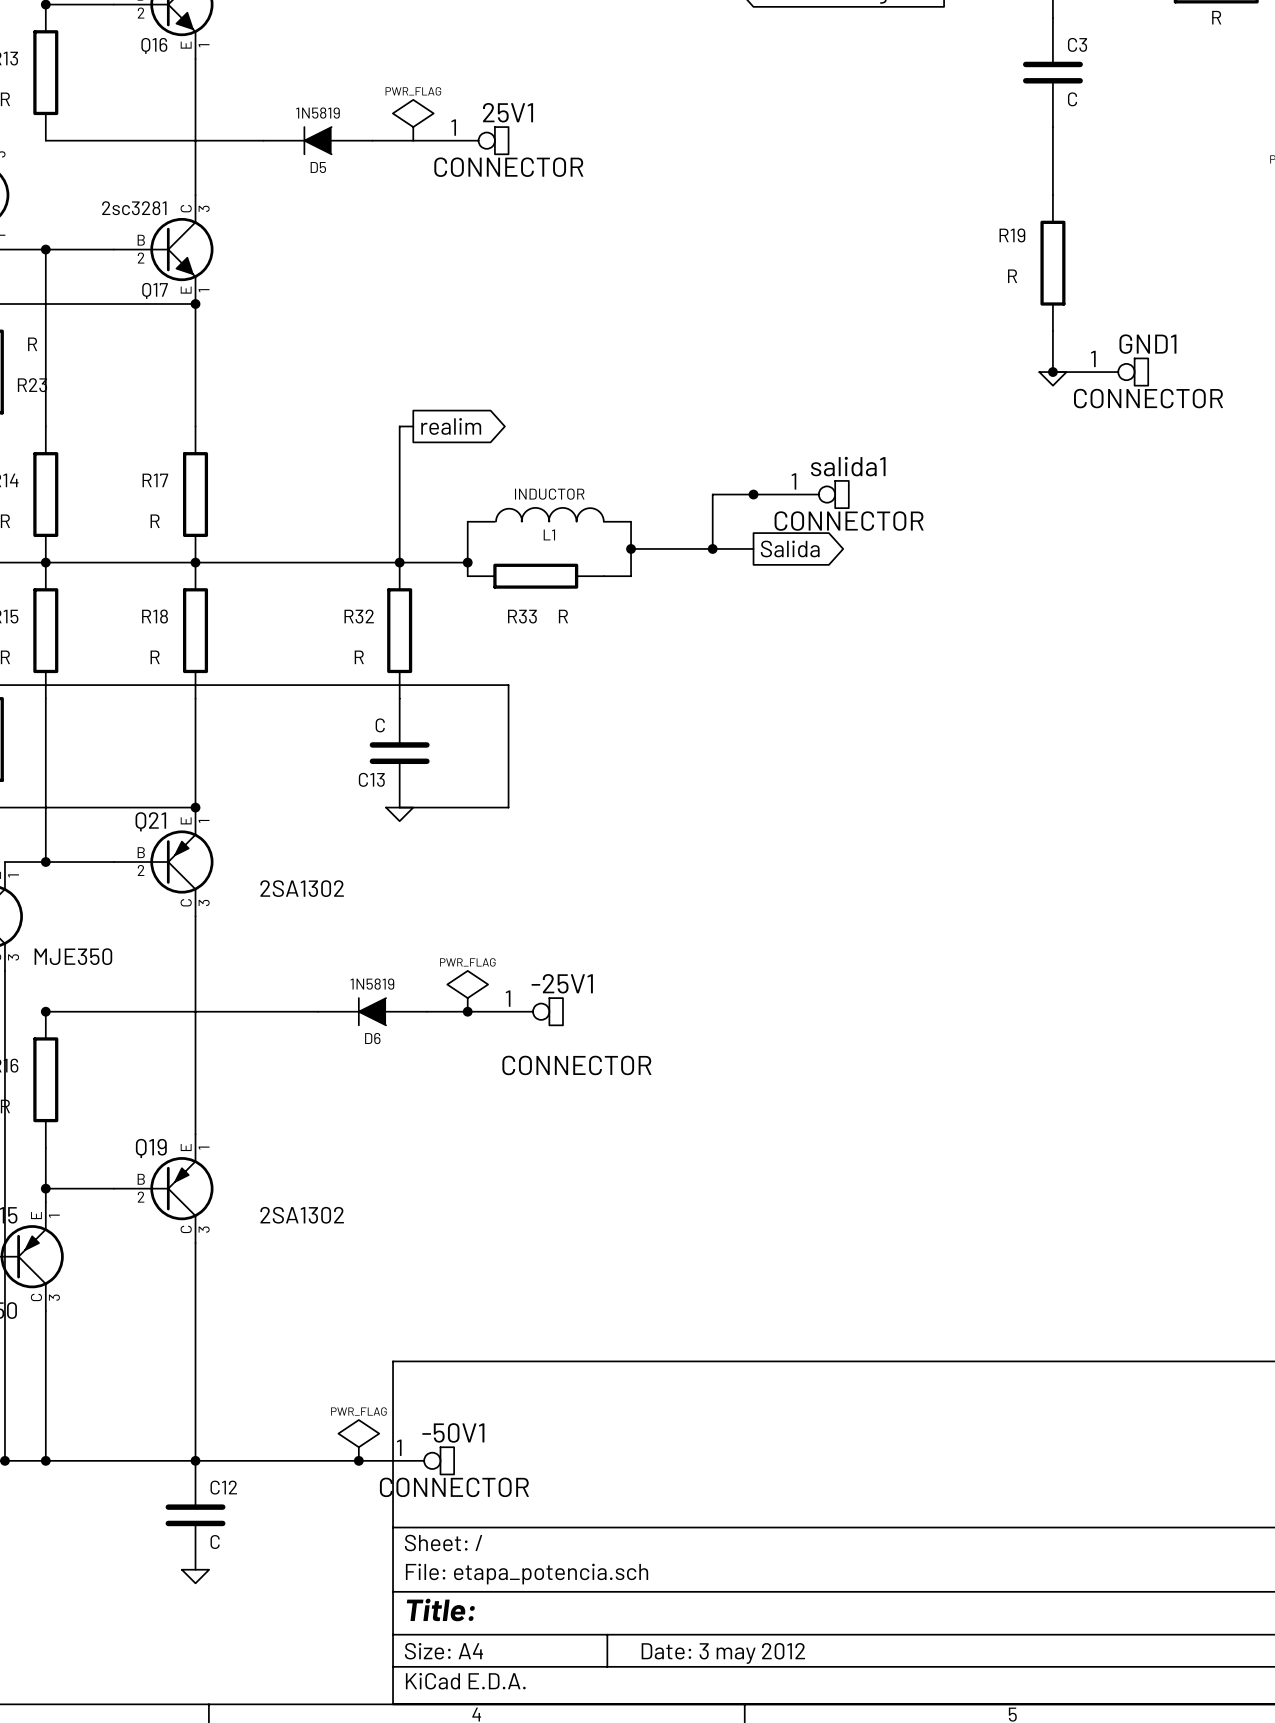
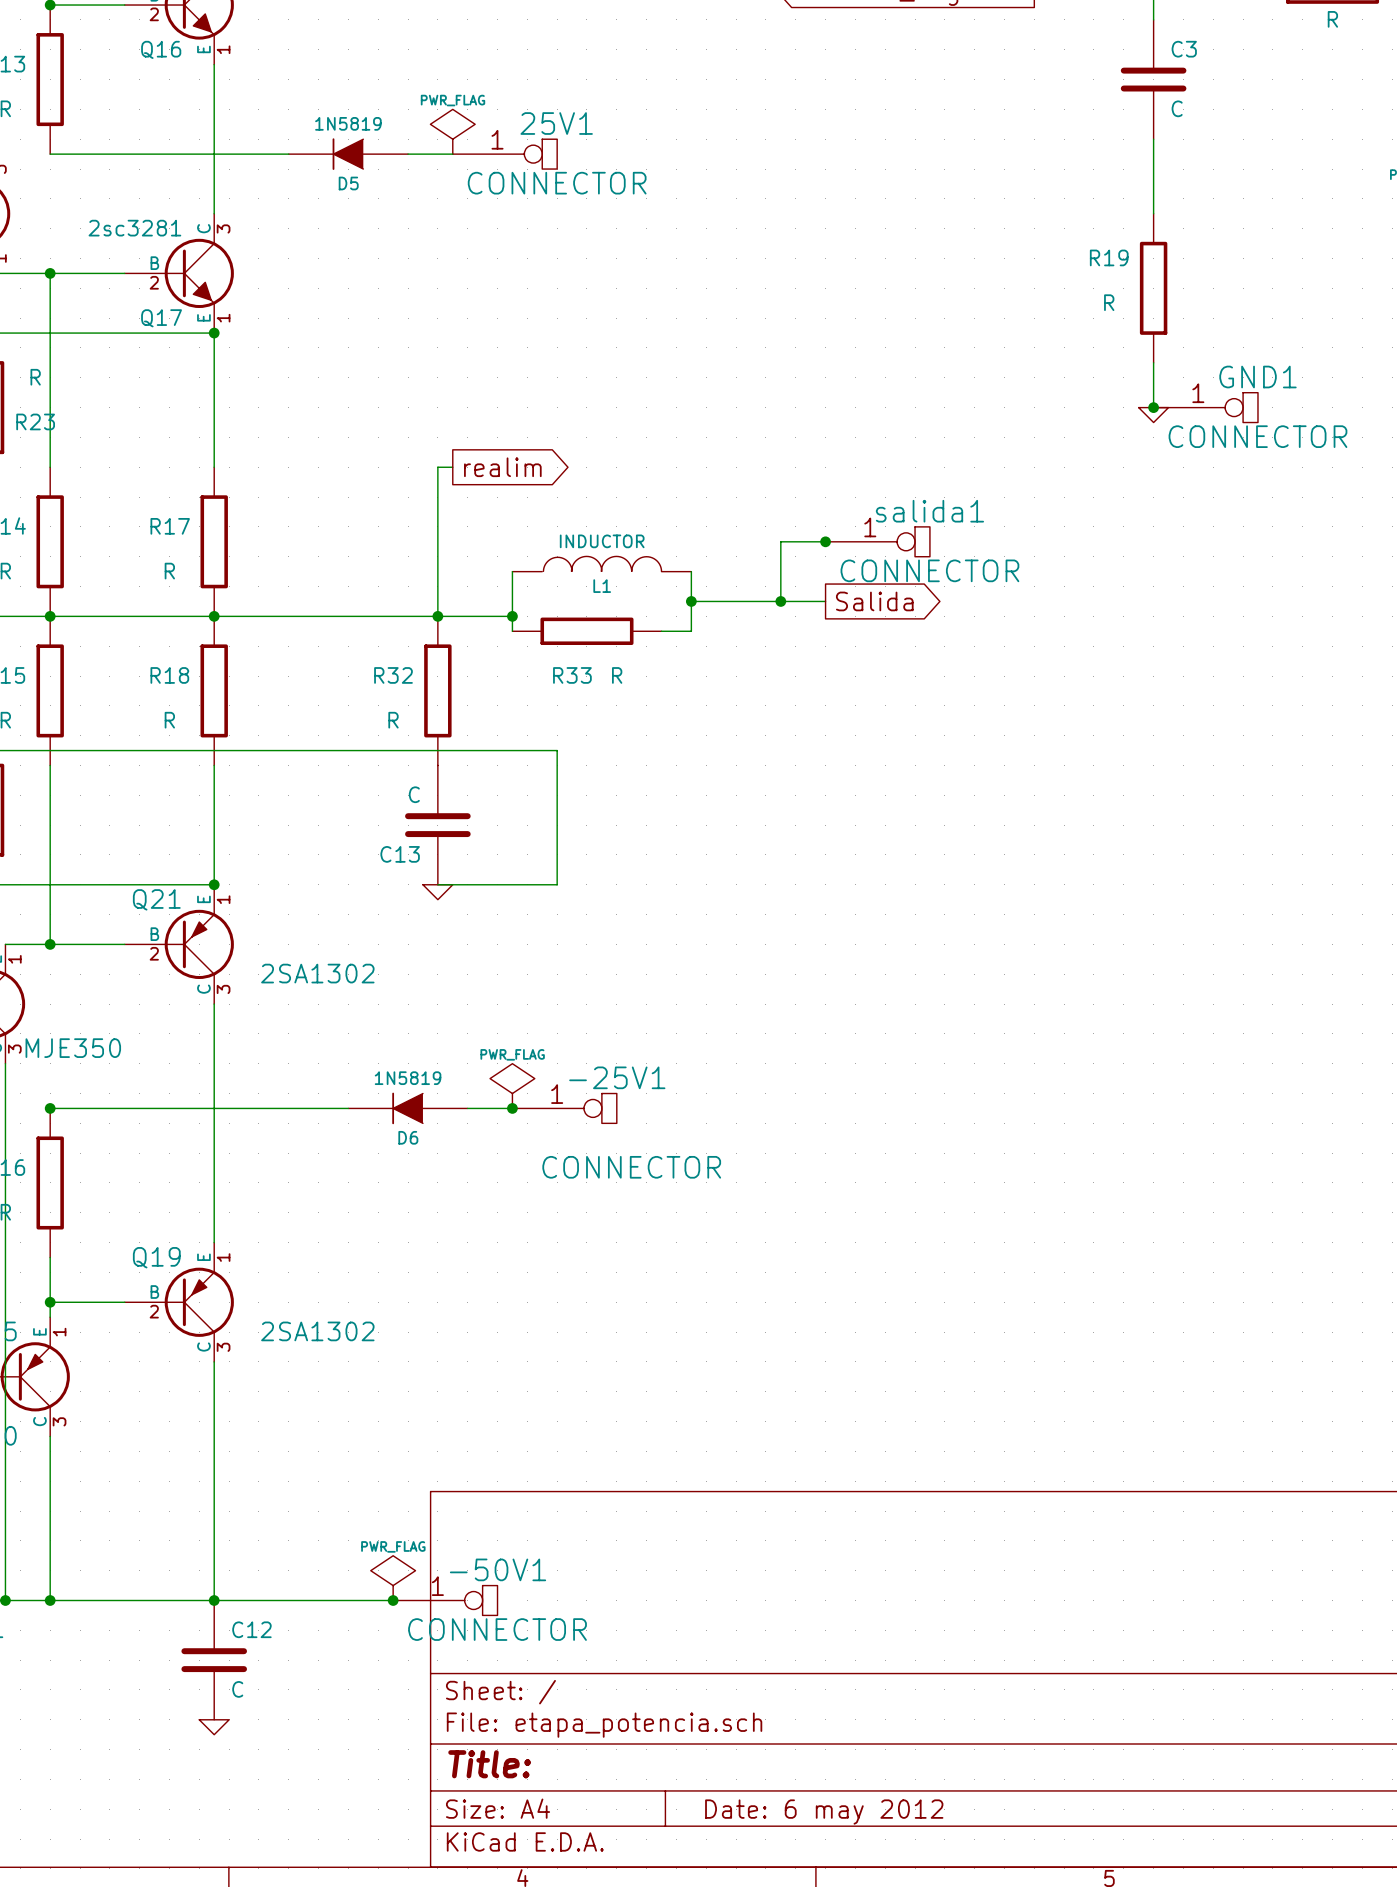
title block: Date: 3 may 2012 (723, 1653) -> Date: 6 may 2012 (824, 1812)

